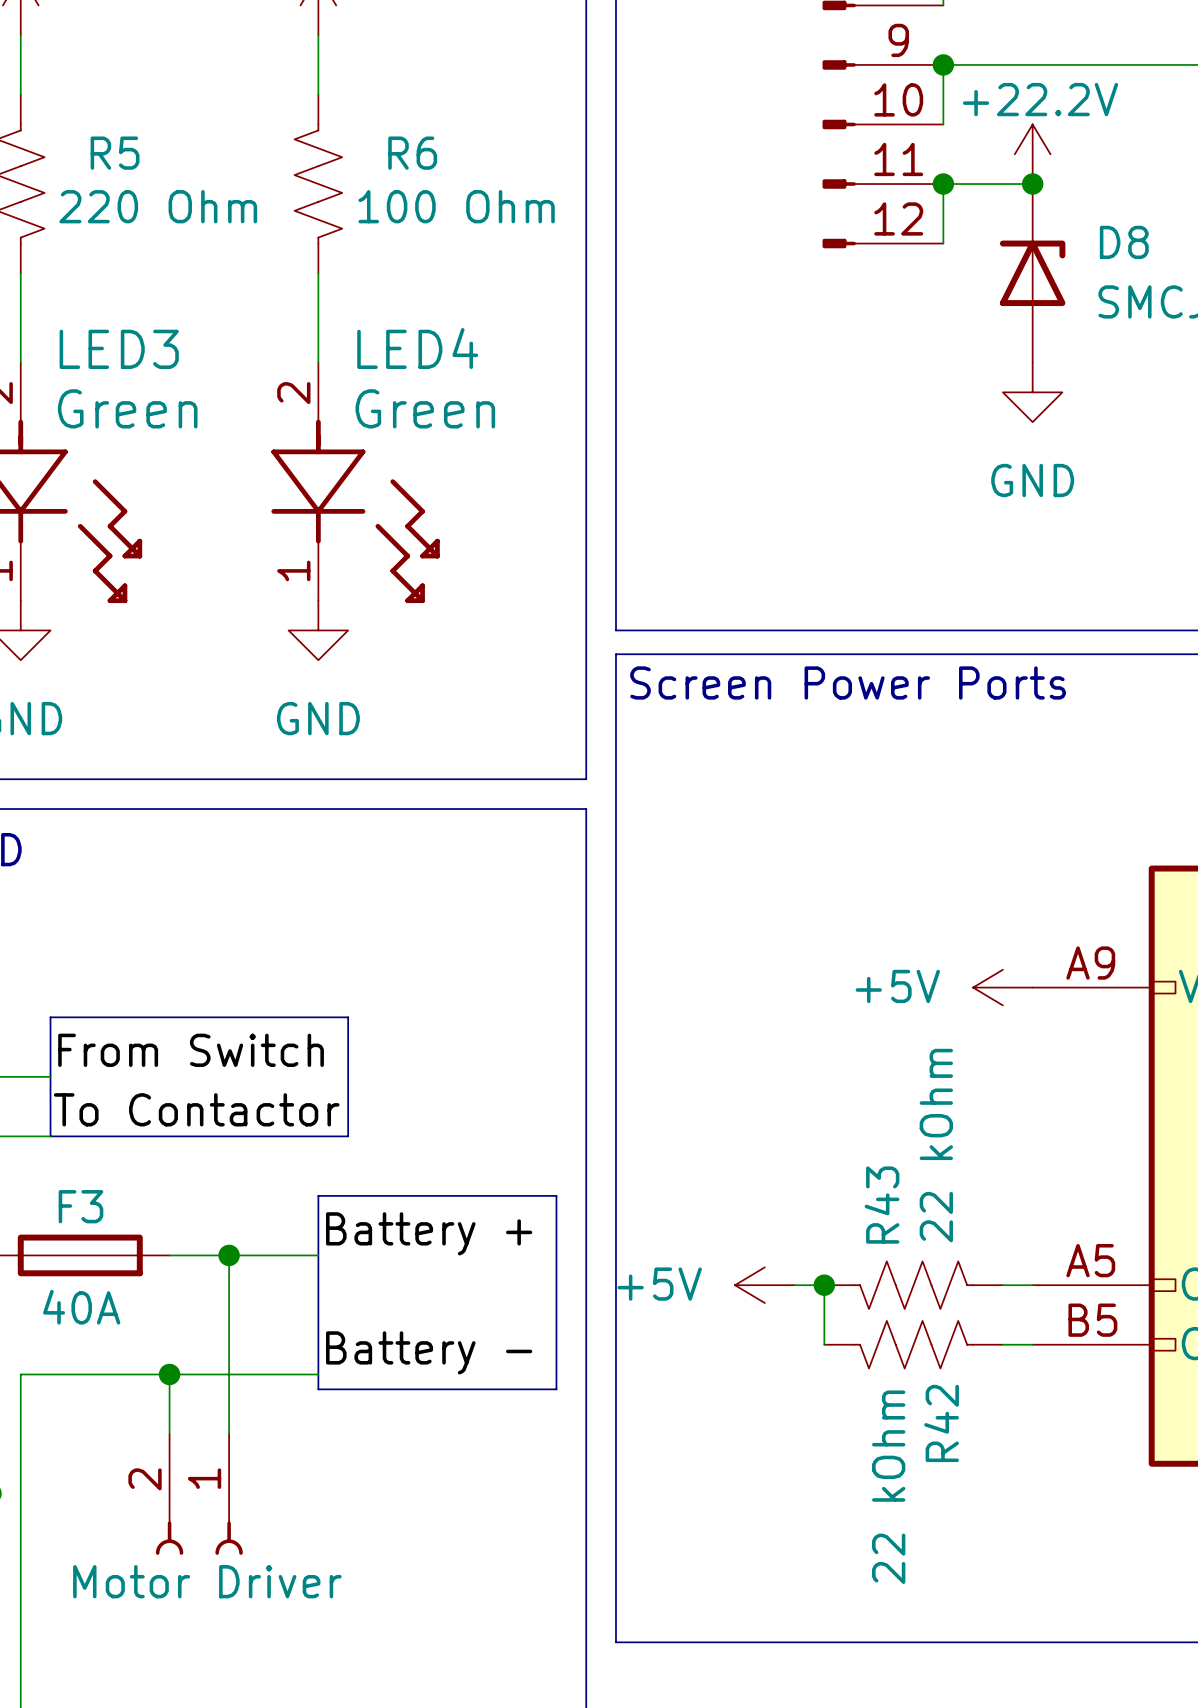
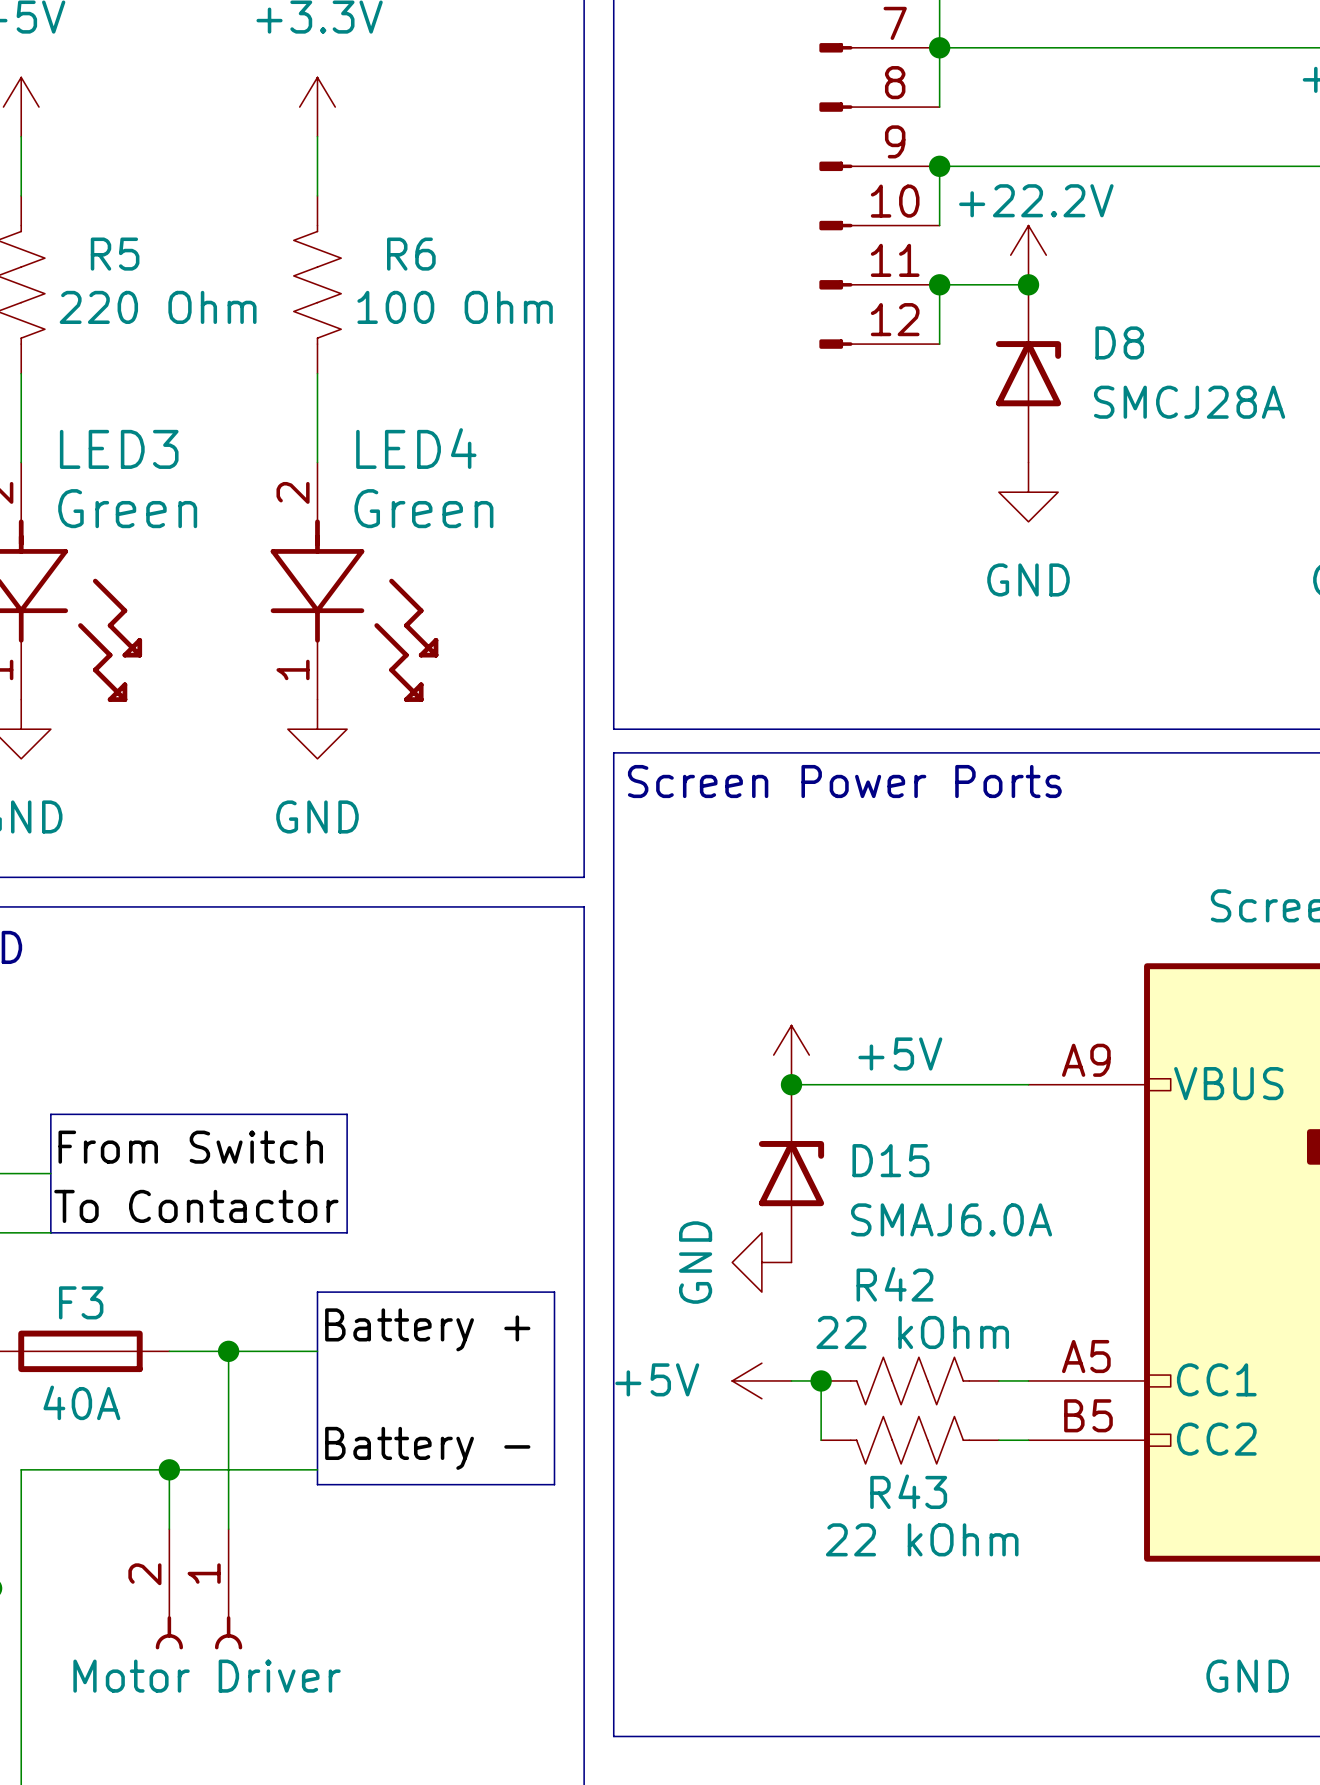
power symbol text position: +5V (897, 986) -> +5V (900, 1053)
wire: none -> (791, 1084) (1028, 1084)
junction: none -> (791, 1084)
power symbol rotation: 0° (1002, 987) -> 90° clockwise (791, 1055)
power symbol position: +5V (1002, 987) -> +5V (791, 1055)
D15: none -> SMAJ6.0A (791, 1173)
R43 value rotation: 0° (936, 1145) -> 90° clockwise (912, 1332)
power symbol: none -> GND (761, 1262)
R43 name: R43 (882, 1205) -> R42 (894, 1284)
R42 name: R42 (941, 1423) -> R43 (908, 1491)
R42 value rotation: 0° (888, 1487) -> 90° clockwise (922, 1539)

